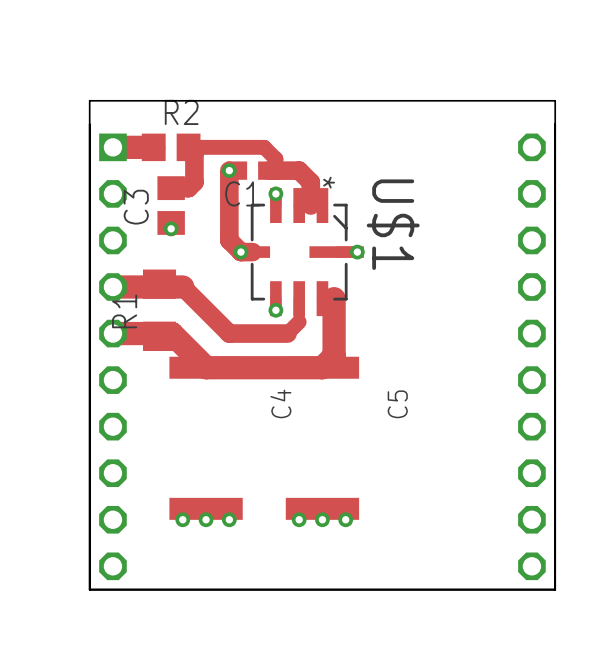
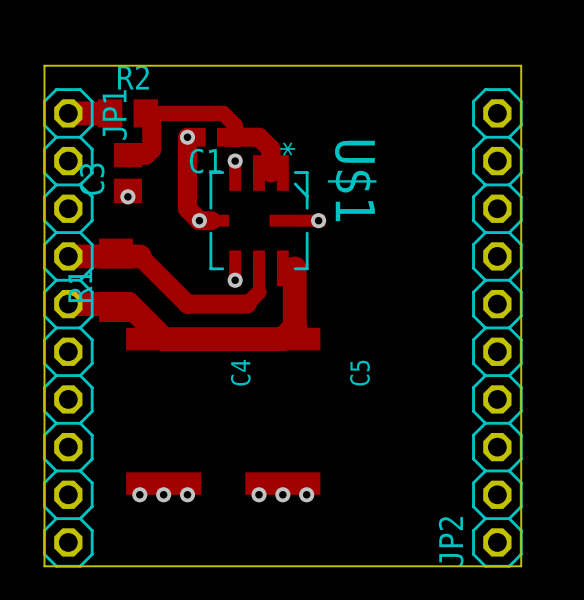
JP1: none -> (68, 327)
part: (322, 356) -> none
JP2: none -> (497, 327)

